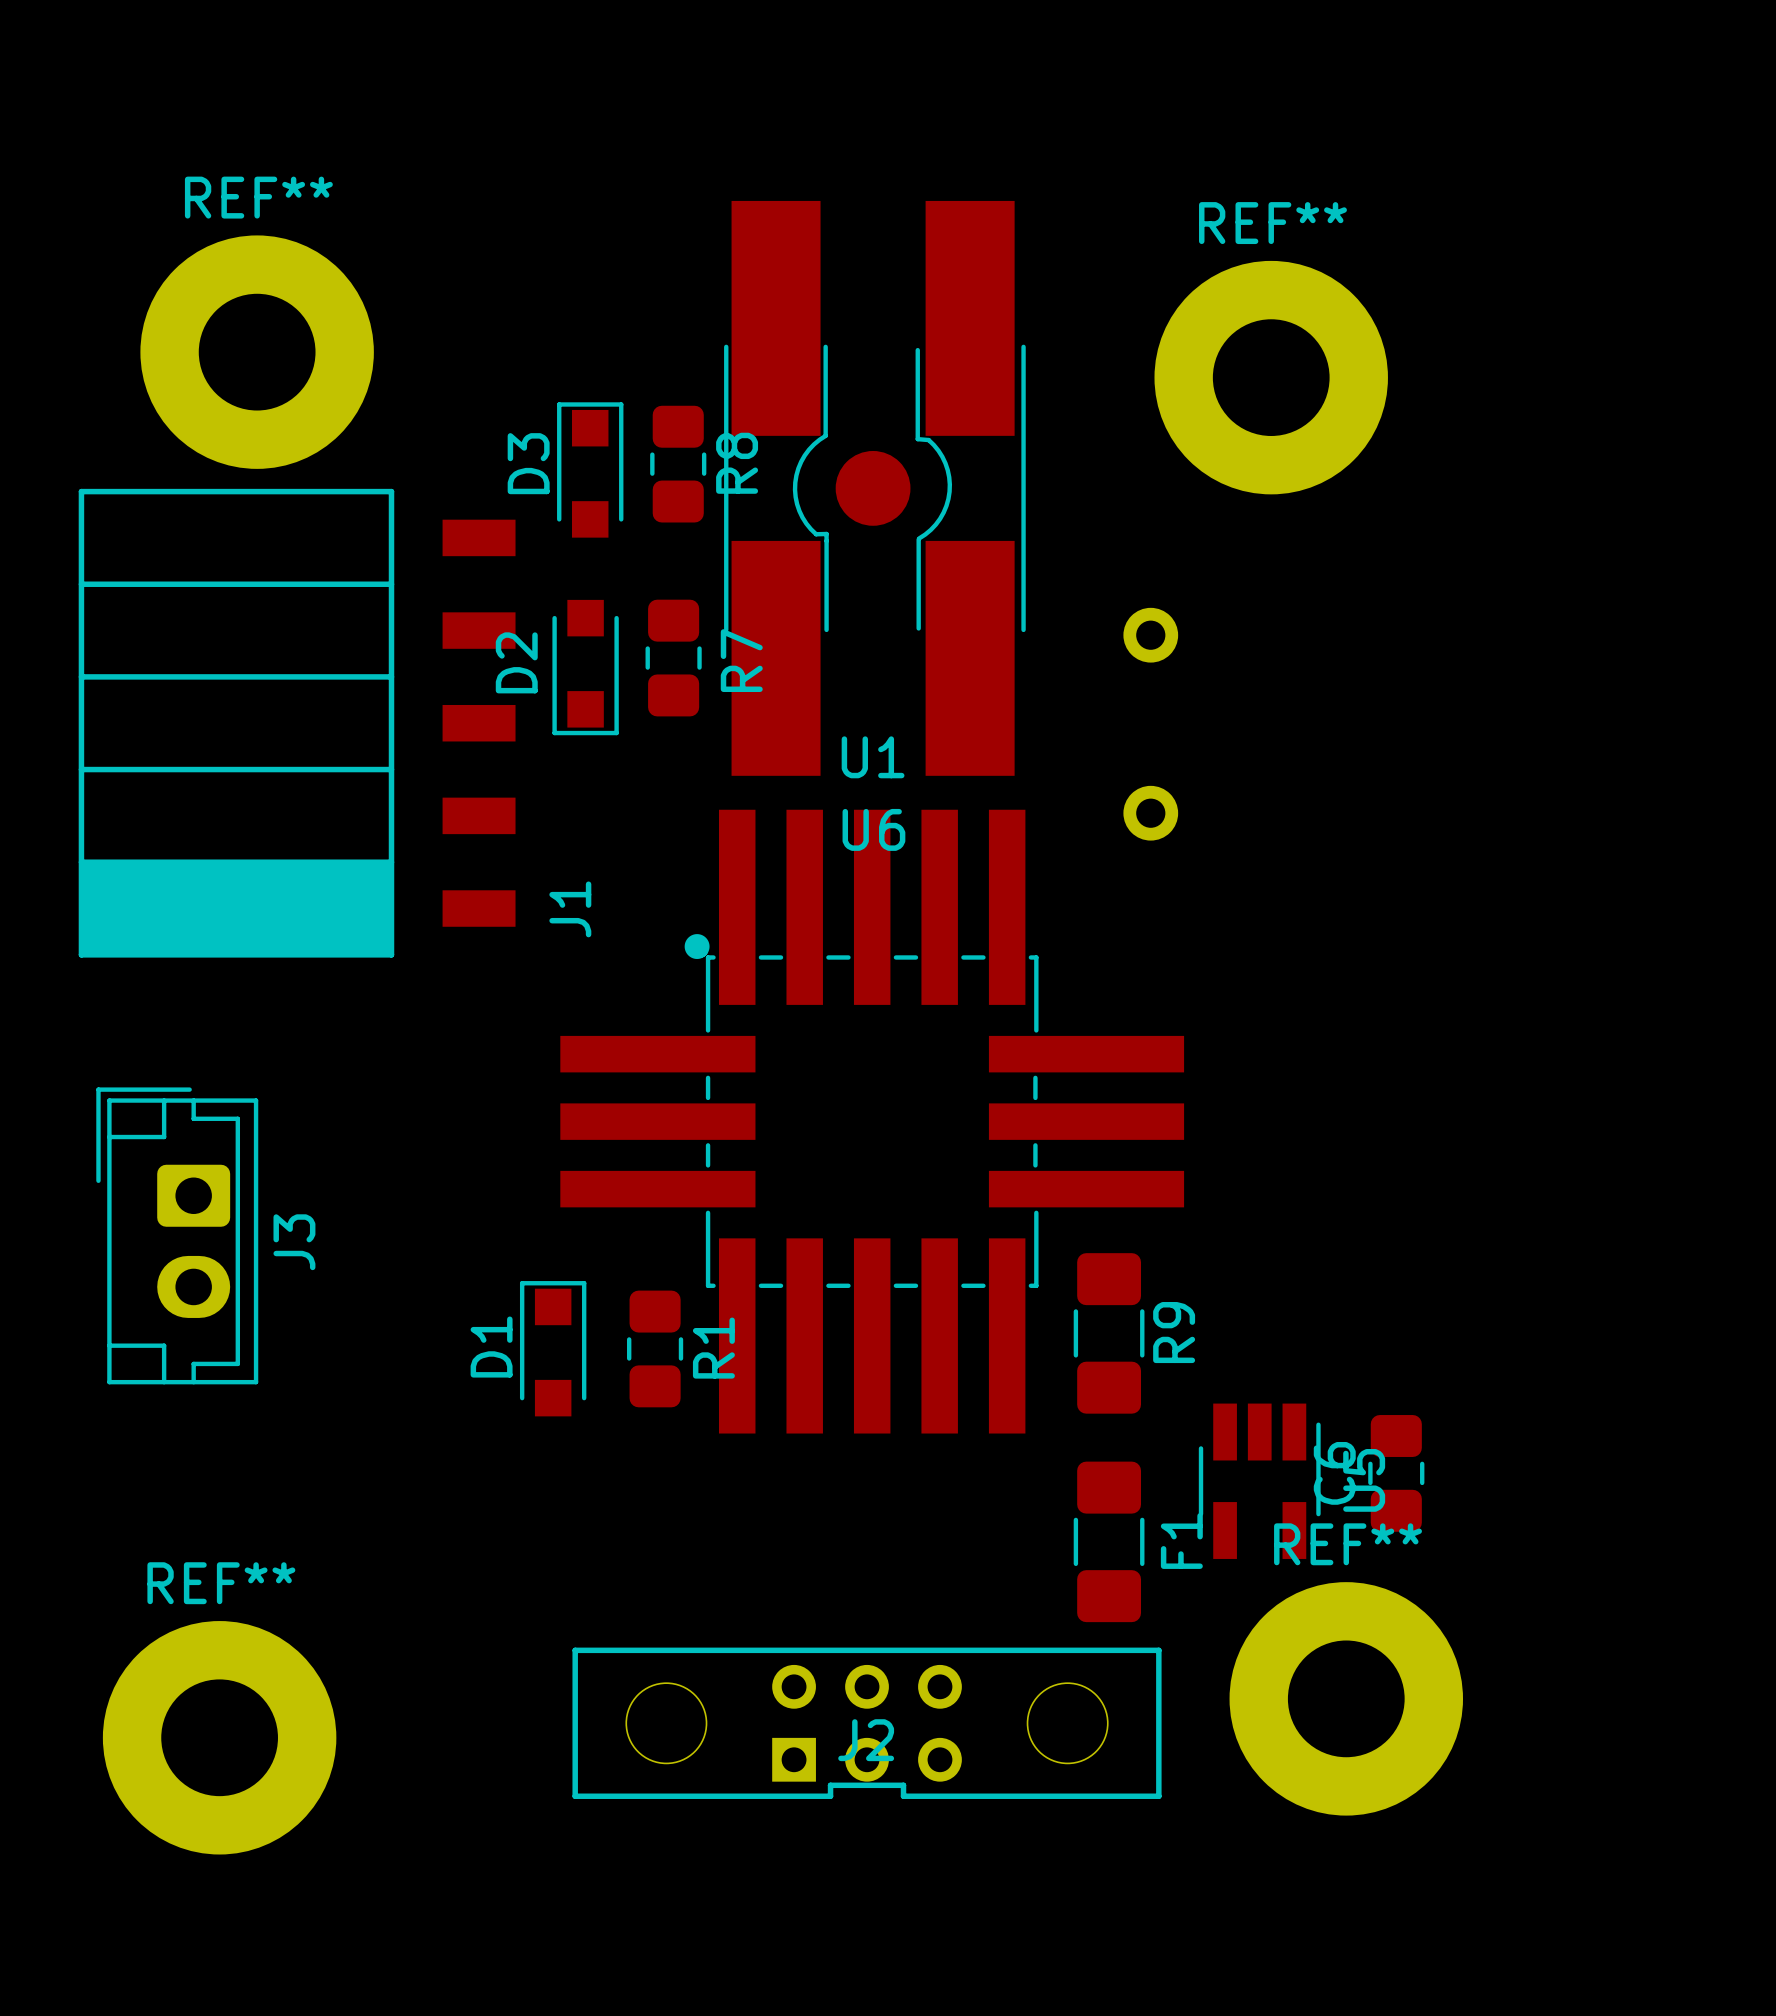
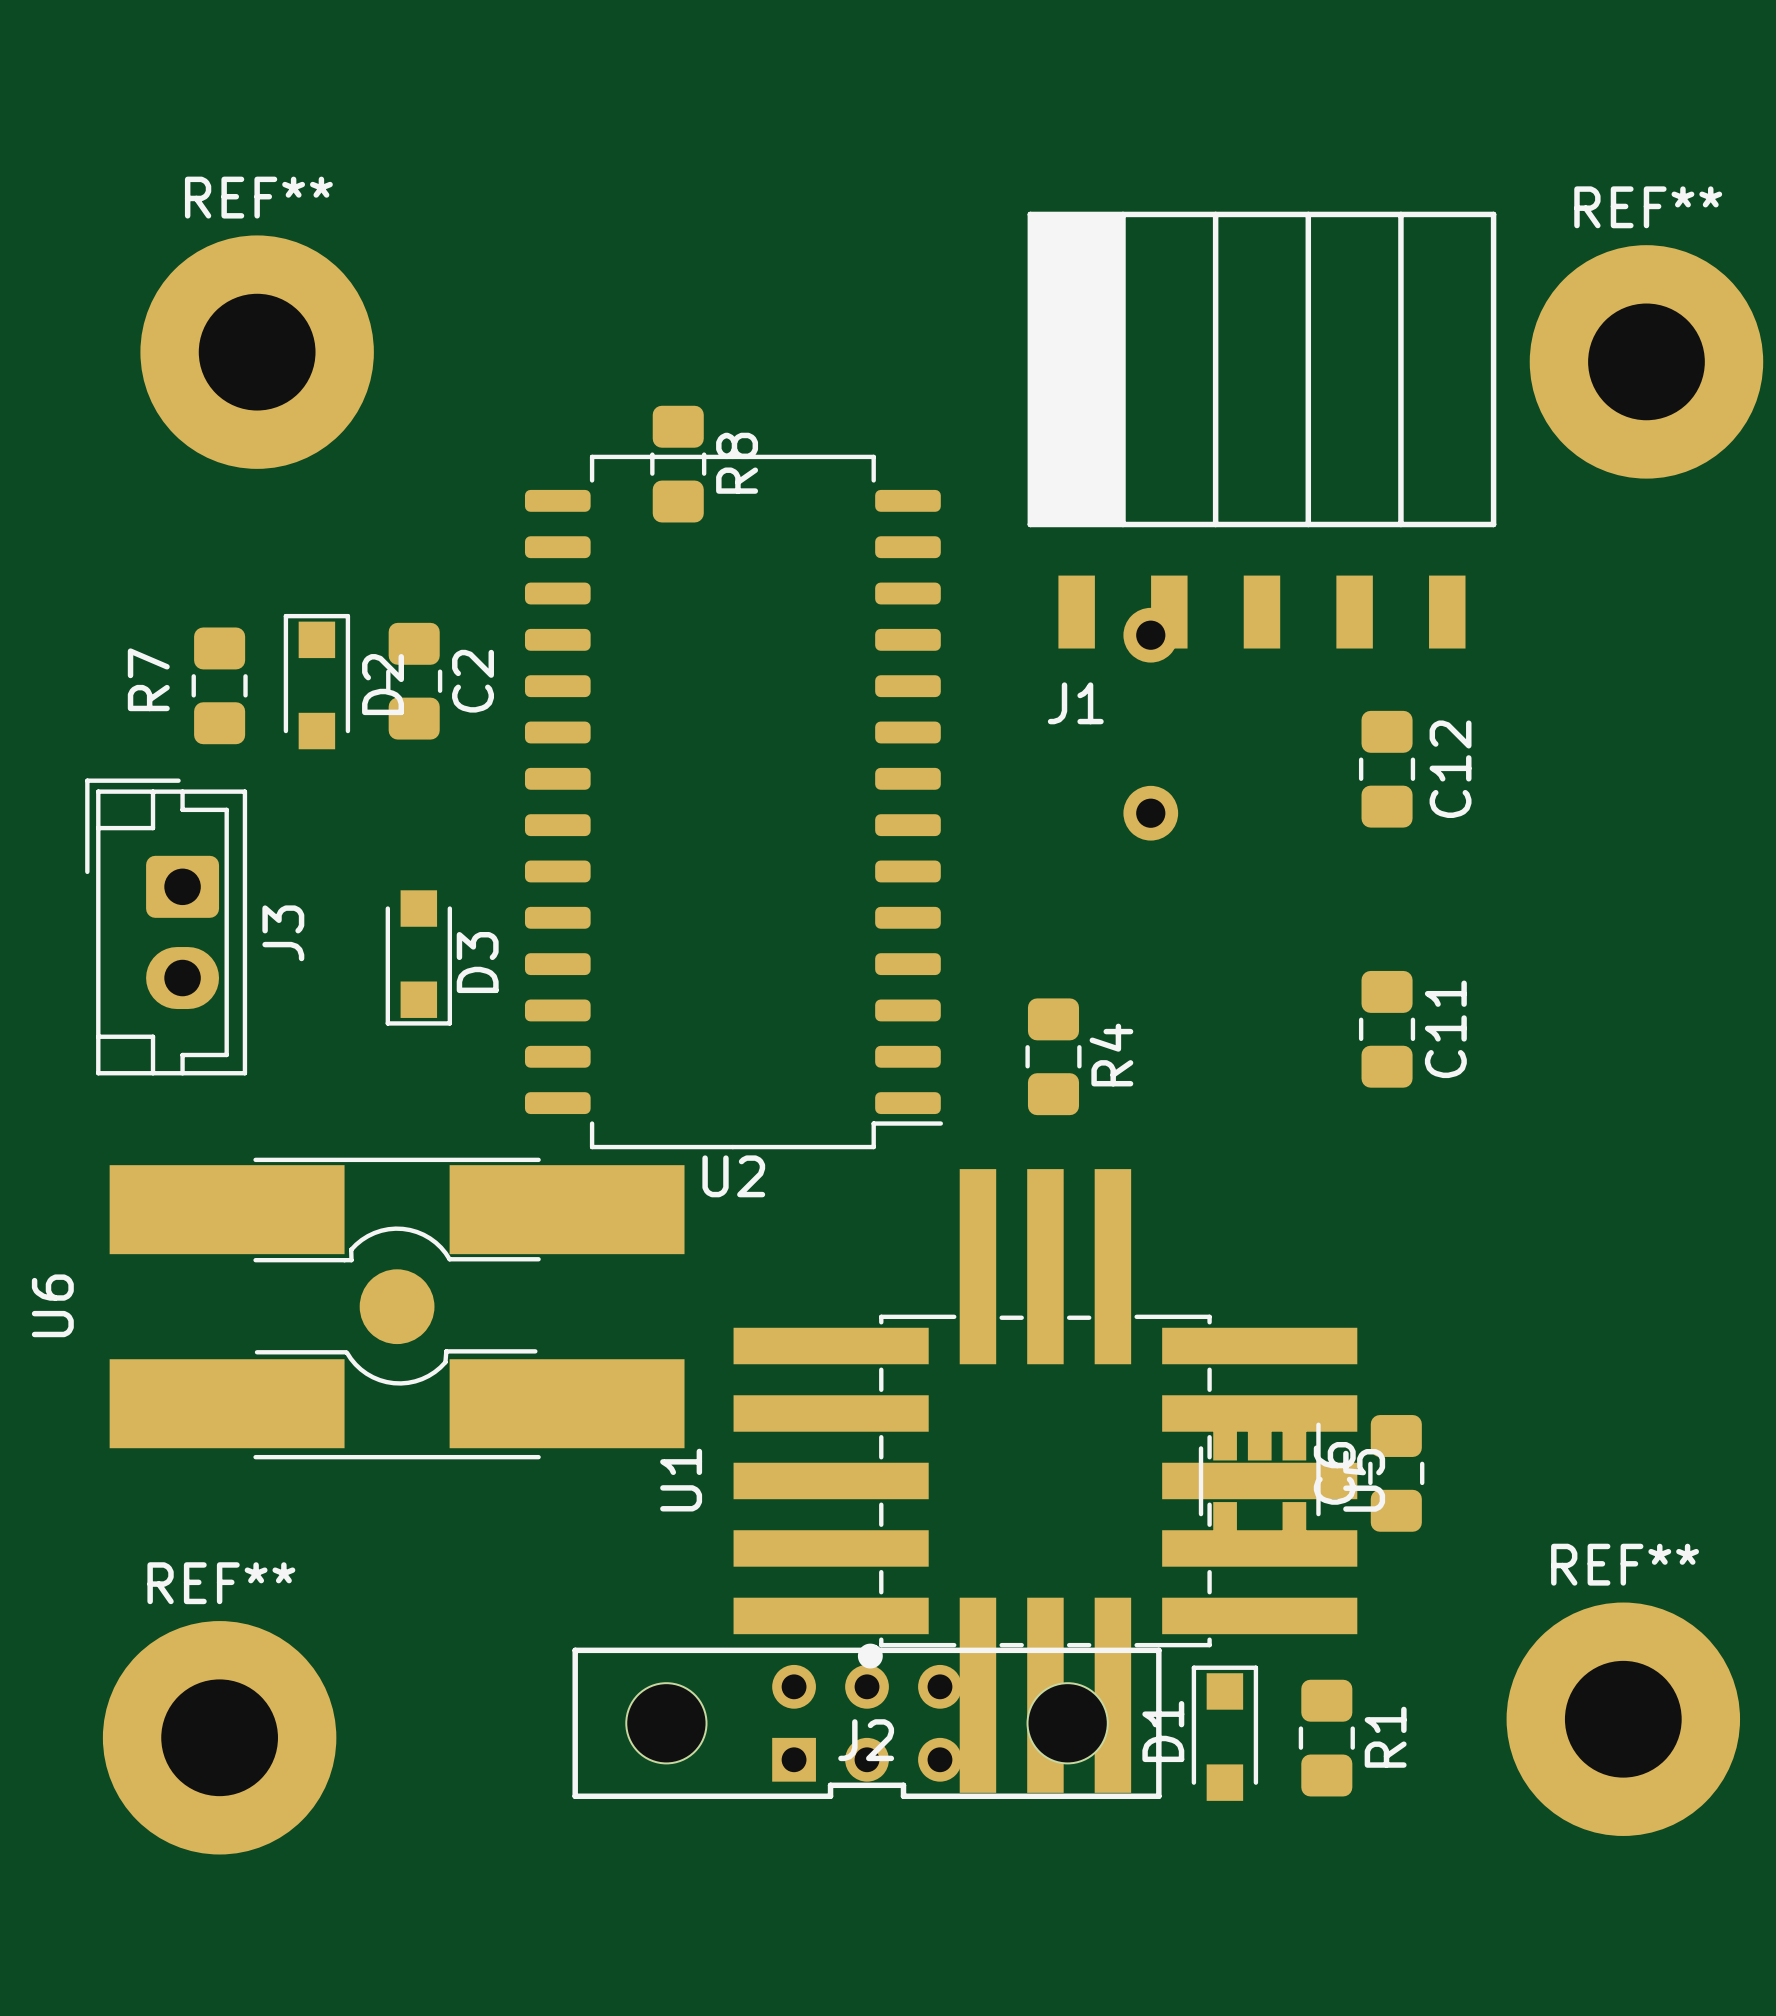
REF** position: (1271, 377) -> (1646, 361)
D3 rotation: 0° (590, 469) -> 180° (418, 957)
D3 position: (590, 469) -> (418, 957)
U6 rotation: 0° (874, 488) -> 90° clockwise (397, 1308)
U6 position: (874, 488) -> (397, 1308)
R7 position: (673, 658) -> (219, 685)
R7 name position: R7 (741, 660) -> R7 (148, 679)
D2 rotation: 0° (585, 667) -> 180° (316, 681)
D2 position: (585, 667) -> (316, 681)
C2: none -> (414, 681)
J1 rotation: 0° (297, 723) -> 90° clockwise (1261, 430)
J1 position: (297, 723) -> (1261, 430)
C12: none -> (1387, 769)
U2: none -> (733, 801)
C11: none -> (1387, 1029)
R4: none -> (1053, 1056)
U1 rotation: 0° (872, 1121) -> 90° counterclockwise (1045, 1480)
U1 position: (872, 1121) -> (1045, 1480)
J3 position: (177, 1235) -> (166, 926)
R9: (1109, 1333) -> none
D1 position: (553, 1348) -> (1224, 1733)
R1 position: (655, 1348) -> (1326, 1738)
F1: (1109, 1541) -> none
REF** position: (1346, 1698) -> (1623, 1719)

